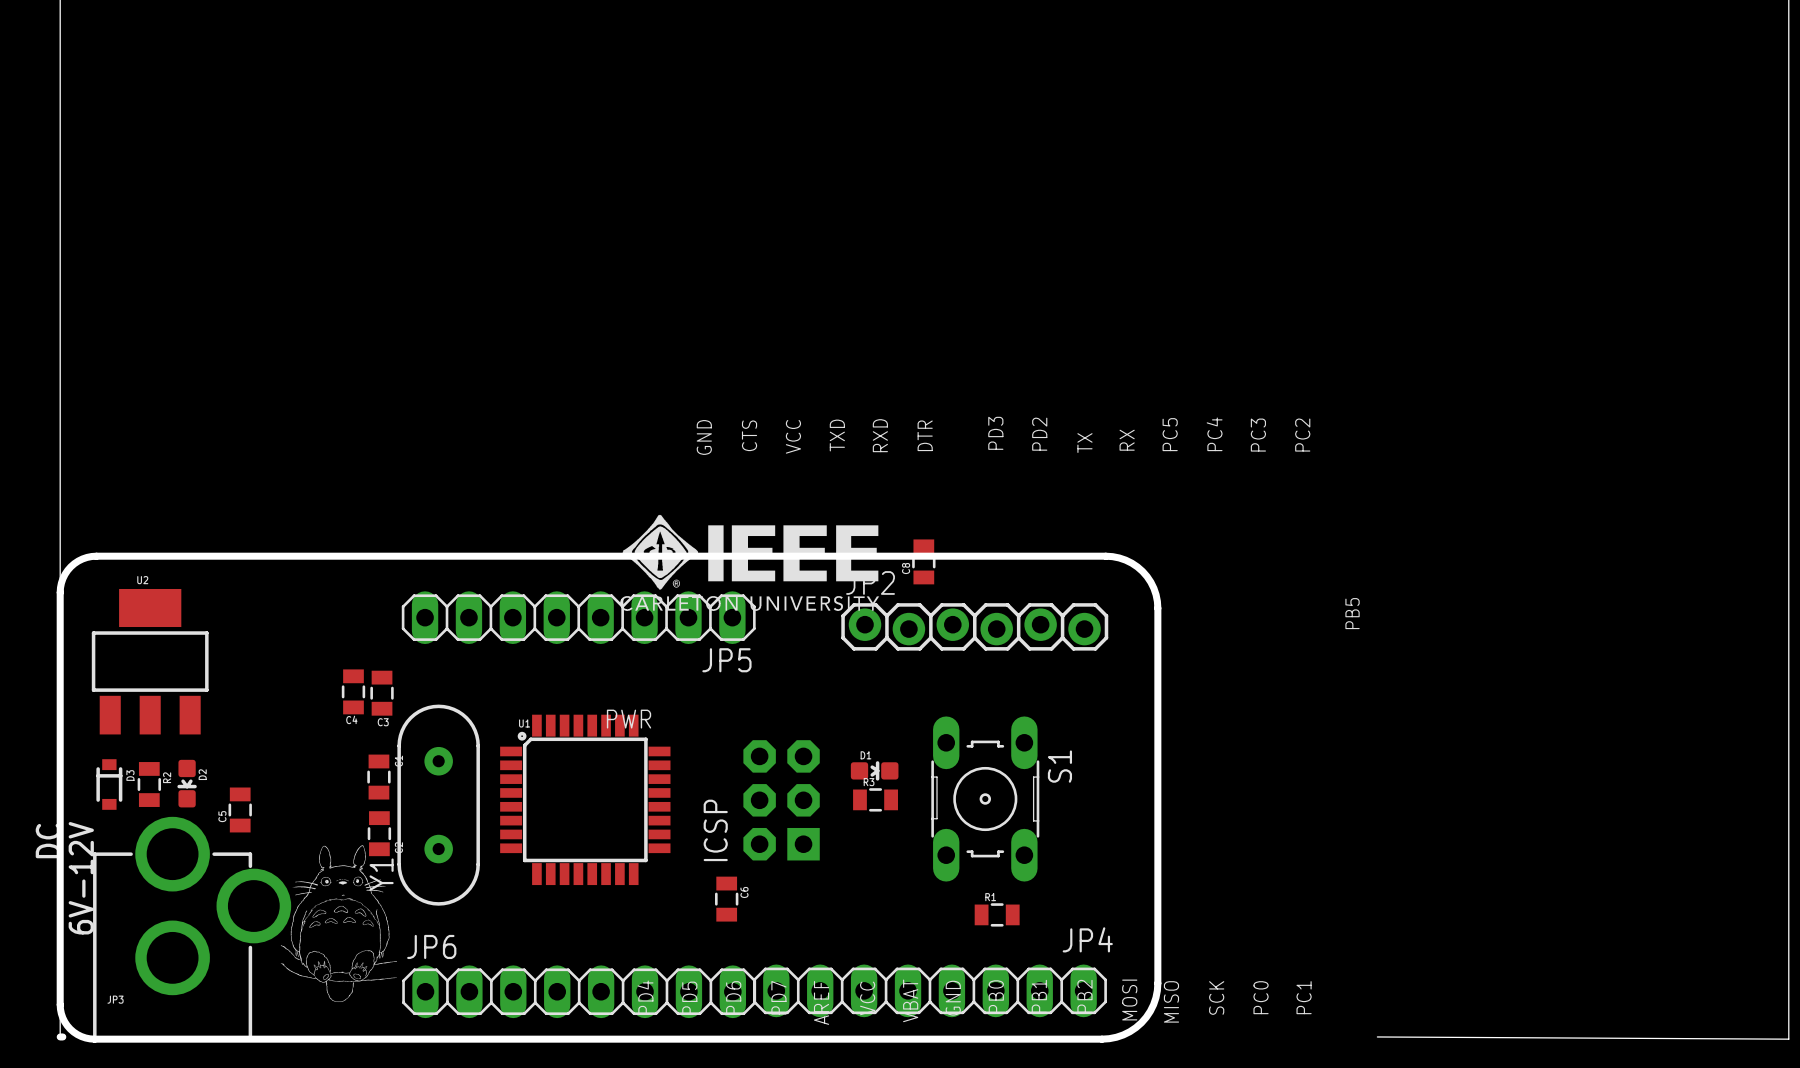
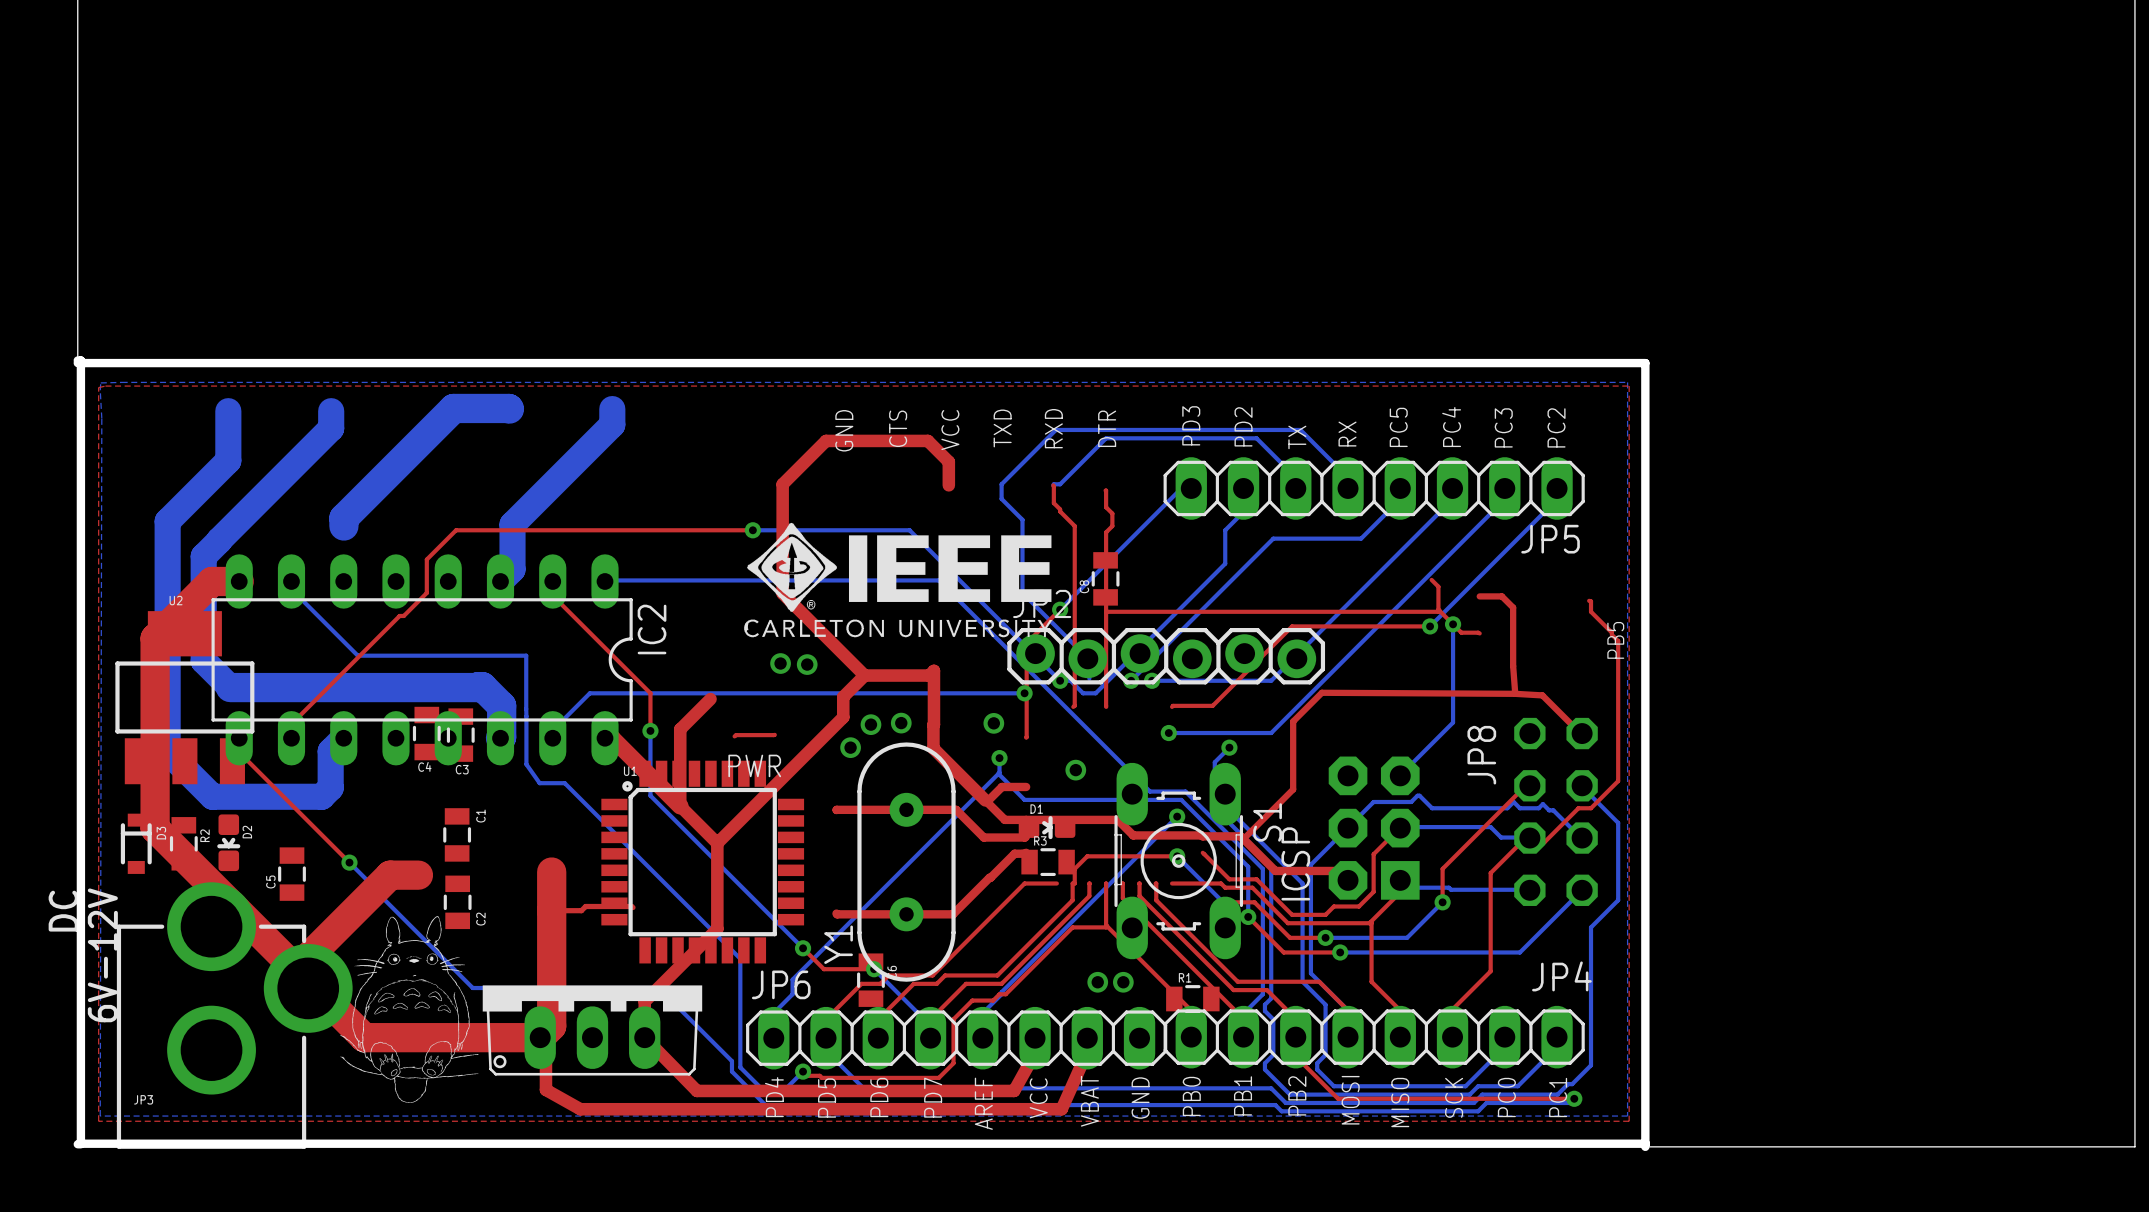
board edge: none -> (77, 360) (80, 360) (80, 1143) (1645, 1143)
bottom zone outline: none -> (121, 382) (1627, 382) (1627, 1116) (100, 1116) (101, 418) (100, 390) (100, 382) (121, 382)
top zone outline: none -> (105, 386) (1629, 386) (1629, 1121) (98, 1121) (98, 387) (105, 386)
bottom track: none -> (509, 409) (453, 408) (343, 518) (343, 526)
bottom track: none -> (612, 409) (612, 424) (512, 524) (512, 569) (500, 581)
bottom track: none -> (228, 411) (228, 460) (167, 521) (167, 751) (212, 796) (321, 796) (330, 787) (330, 751) (343, 738)
bottom track: none -> (331, 411) (331, 428) (203, 556) (203, 660) (230, 687) (482, 686) (501, 705) (500, 738)
top track: none -> (948, 485) (948, 461) (927, 440) (826, 440) (782, 484) (782, 593) (864, 675)
top track: none -> (1053, 485) (1053, 503) (1074, 526) (1073, 706)
bottom track: none -> (1053, 485) (1060, 484) (1106, 438) (1256, 438) (1294, 475) (1294, 488) (1295, 488)
bottom track: none -> (1191, 488) (1181, 488) (1060, 609)
bottom track: none -> (1243, 488) (1241, 488) (1241, 513) (1225, 530) (1225, 563) (1095, 693) (1083, 693) (1070, 680) (1060, 680) (909, 530) (752, 530)
bottom track: none -> (1348, 488) (1346, 488) (1346, 475) (1300, 429) (1055, 429) (1001, 484) (1001, 498) (1022, 519) (1022, 592) (1089, 659) (1089, 678)
bottom track: none -> (1400, 488) (1398, 488) (1398, 501) (1361, 538) (1273, 538) (1131, 680)
bottom track: none -> (1452, 488) (1450, 488) (1450, 501) (1271, 680) (1152, 680)
bottom track: none -> (1504, 488) (1503, 488) (1503, 501) (1271, 733) (1168, 733)
bottom track: none -> (1557, 488) (1555, 488) (1555, 501) (1430, 626)
top track: none -> (1105, 490) (1106, 507) (1112, 513) (1112, 526) (1106, 532) (1106, 706)
top track: none -> (752, 530) (456, 530) (426, 559) (426, 592) (403, 615) (399, 615) (293, 722) (291, 738)
via: none -> (752, 530)
board edge: (96, 556) (1105, 556) (1125, 560) (1137, 566) (1147, 576) (1153, 588) (1157, 608) (1157, 983) (1153, 1004) (1141, 1022) (1129, 1031) (1116, 1037) (1102, 1039) (94, 1039) (81, 1036) (67, 1025) (61, 1013) (60, 1004) (60, 592) (62, 578) (70, 566) (82, 558) (96, 556) -> none
top track: none -> (1431, 579) (1438, 586) (1438, 609) (1461, 632) (1479, 633)
top track: none -> (239, 581) (212, 581) (155, 638) (155, 828) (364, 1037) (540, 1037)
bottom track: none -> (291, 581) (293, 590) (357, 655) (526, 655) (526, 764) (539, 783) (564, 783) (740, 958) (740, 1067) (761, 1088) (786, 1088) (803, 1071)
top track: none -> (552, 581) (554, 597) (650, 693) (650, 730)
bottom track: none -> (605, 581) (938, 580) (1149, 791) (1185, 791) (1262, 868) (1262, 994) (1244, 1013) (1243, 1037)
top track: none -> (1479, 596) (1501, 596) (1513, 607) (1515, 693)
top track: none -> (1589, 600) (1591, 601) (1591, 611) (1618, 641) (1618, 781) (1591, 808) (1578, 808) (1545, 841) (1532, 841) (1529, 838) (1524, 839) (1490, 873) (1490, 971) (1453, 1008) (1452, 1037)
top track: none -> (1060, 609) (1026, 643) (1026, 737)
via: none -> (1060, 609)
top track: none -> (1439, 610) (1106, 611)
bottom track: none -> (1453, 624) (1453, 722) (1400, 775)
via: none -> (1453, 624)
top track: none -> (1430, 626) (1292, 626) (1212, 705) (1172, 706)
via: none -> (1430, 626)
JP5 position: (578, 617) -> (1374, 488)
IC2: none -> (422, 659)
via: none -> (780, 663)
via: none -> (807, 664)
top track: none -> (864, 675) (843, 696) (843, 717) (717, 843)
top track: none -> (864, 675) (929, 675) (933, 670) (933, 748) (1004, 819) (1117, 819) (1133, 835) (1240, 836) (1275, 870) (1338, 870) (1348, 880)
via: none -> (1060, 680)
via: none -> (1131, 680)
via: none -> (1152, 680)
bottom track: none -> (1024, 693) (589, 693) (554, 728) (552, 738)
via: none -> (1024, 693)
top track: none -> (1515, 693) (1542, 695) (1582, 733)
top track: none -> (1515, 693) (1321, 692) (1293, 721) (1293, 789) (1243, 839)
top track: none -> (710, 699) (680, 729) (680, 806)
via: none -> (901, 723)
via: none -> (993, 723)
via: none -> (870, 724)
bottom track: none -> (650, 730) (650, 795) (803, 948)
via: none -> (650, 730)
via: none -> (1168, 733)
top track: none -> (774, 734) (734, 736)
top track: none -> (239, 738) (240, 753) (349, 862)
top track: none -> (605, 738) (612, 738) (680, 806)
via: none -> (850, 747)
bottom track: none -> (1229, 747) (1214, 762) (1214, 808) (1271, 864) (1271, 998) (1264, 1004) (1264, 1011) (1273, 1019) (1273, 1054) (1264, 1063) (1264, 1069) (1290, 1094) (1469, 1094) (1478, 1086) (1517, 1086) (1555, 1048) (1557, 1037)
via: none -> (1229, 747)
bottom track: none -> (999, 758) (999, 772) (792, 979) (792, 994) (773, 1013) (773, 1038)
via: none -> (999, 758)
bottom track: none -> (1229, 768) (1229, 810) (1302, 883) (1302, 981) (1325, 1004) (1325, 1054) (1317, 1063) (1317, 1069) (1333, 1086) (1465, 1086) (1503, 1048) (1504, 1037)
via: none -> (1075, 770)
bottom track: none -> (998, 773) (1024, 799) (1181, 799) (1248, 866) (1248, 916)
top track: none -> (1529, 785) (1524, 787) (1442, 868) (1442, 902)
bottom track: none -> (1582, 785) (1618, 822) (1618, 900) (1591, 927) (1591, 1065) (1572, 1084) (1568, 1084) (1557, 1094) (1482, 1094) (1473, 1102) (1285, 1102) (1271, 1088) (863, 1088) (826, 1050) (826, 1038)
top track: none -> (1026, 786) (1001, 786) (986, 801)
top track: none -> (680, 806) (717, 843)
top track: none -> (836, 809) (956, 809) (983, 837) (1026, 836)
JP8: none -> (1556, 811)
bottom track: none -> (1177, 816) (982, 1013) (982, 1038)
via: none -> (1177, 816)
top track: none -> (1400, 828) (1373, 854) (1373, 891) (1359, 906) (1333, 906) (1325, 914) (1292, 914) (1256, 879) (1229, 879) (1202, 852)
bottom track: none -> (1400, 828) (1490, 827) (1501, 837) (1529, 838)
bottom track: none -> (1582, 838) (1553, 810) (1549, 810) (1542, 804) (1538, 808) (1519, 808) (1513, 801) (1507, 808) (1432, 808) (1419, 795) (1411, 801) (1373, 801) (1310, 864) (1310, 973) (1346, 1008) (1346, 1036) (1348, 1037)
top track: none -> (717, 843) (717, 928) (644, 1001) (644, 1037) (696, 1090) (1014, 1090) (1035, 1053) (1035, 1038)
top track: none -> (1026, 852) (1014, 853) (953, 914) (836, 913)
top track: none -> (1177, 856) (1087, 856) (1074, 868) (1072, 900) (997, 975) (945, 975) (936, 983) (913, 983) (878, 1019) (878, 1038)
bottom track: none -> (1177, 856) (1223, 902)
via: none -> (1177, 856)
bottom track: none -> (349, 862) (472, 988) (658, 988) (731, 1061) (731, 1071) (765, 1105) (1275, 1105) (1281, 1111) (1478, 1111) (1486, 1102) (1570, 1102) (1574, 1098)
via: none -> (349, 862)
ICSP position: (781, 800) -> (1374, 828)
Y1 position: (438, 805) -> (906, 862)
top track: none -> (551, 872) (551, 1026) (540, 1037)
top track: none -> (418, 875) (390, 875) (292, 973) (300, 973)
top track: none -> (1400, 880) (1398, 893) (1369, 923) (1287, 923) (1252, 887) (1225, 887) (1221, 883) (1172, 883)
bottom track: none -> (1400, 880) (1407, 887) (1529, 890)
top track: none -> (1056, 883) (1024, 883) (932, 975) (888, 975) (880, 983) (861, 983) (826, 1019) (826, 1038)
top track: none -> (1089, 883) (1089, 896) (1001, 983) (966, 983) (930, 1019) (930, 1038)
top track: none -> (1106, 883) (1106, 925) (1189, 1008) (1189, 1036) (1191, 1037)
top track: none -> (1122, 883) (1122, 898) (1241, 1017) (1243, 1037)
top track: none -> (1139, 883) (1139, 896) (1233, 990) (1267, 990) (1294, 1017) (1296, 1056) (1338, 1098) (1574, 1098)
top track: none -> (1155, 883) (1156, 900) (1237, 981) (1319, 981) (1346, 1008) (1346, 1036) (1348, 1037)
bottom track: none -> (1582, 890) (1519, 952) (1340, 952)
top track: none -> (1223, 902) (1254, 902) (1290, 937) (1325, 937)
bottom track: none -> (1442, 902) (1407, 937) (1325, 937)
via: none -> (1442, 902)
top track: none -> (632, 907) (585, 906) (581, 910) (551, 910)
top track: none -> (1248, 916) (1283, 952) (1340, 952)
via: none -> (1248, 916)
top track: none -> (1370, 922) (1371, 981) (1398, 1008) (1398, 1036) (1400, 1037)
top track: none -> (1107, 926) (1072, 927) (1005, 994) (999, 994) (993, 1000) (972, 1000) (953, 1019) (953, 1063) (938, 1077) (821, 1077) (819, 1075) (807, 1075) (803, 1071)
via: none -> (1325, 937)
top track: none -> (803, 948) (823, 969) (874, 969)
via: none -> (803, 948)
via: none -> (1340, 952)
bottom track: none -> (874, 969) (930, 1025) (930, 1038)
via: none -> (874, 969)
via: none -> (1097, 982)
via: none -> (1123, 982)
part: none -> (592, 1030)
top track: none -> (540, 1037) (545, 1043) (545, 1089) (580, 1109) (1061, 1109) (1081, 1064) (1081, 1043) (1087, 1038)
via: none -> (803, 1071)
JP4 position: (929, 990) -> (1374, 1037)
JP6 position: (579, 991) -> (956, 1038)
via: none -> (1574, 1098)
board edge: (1377, 1036) (1788, 1039) -> (77, 363) (1645, 363) (1645, 1146) (2134, 1146)

